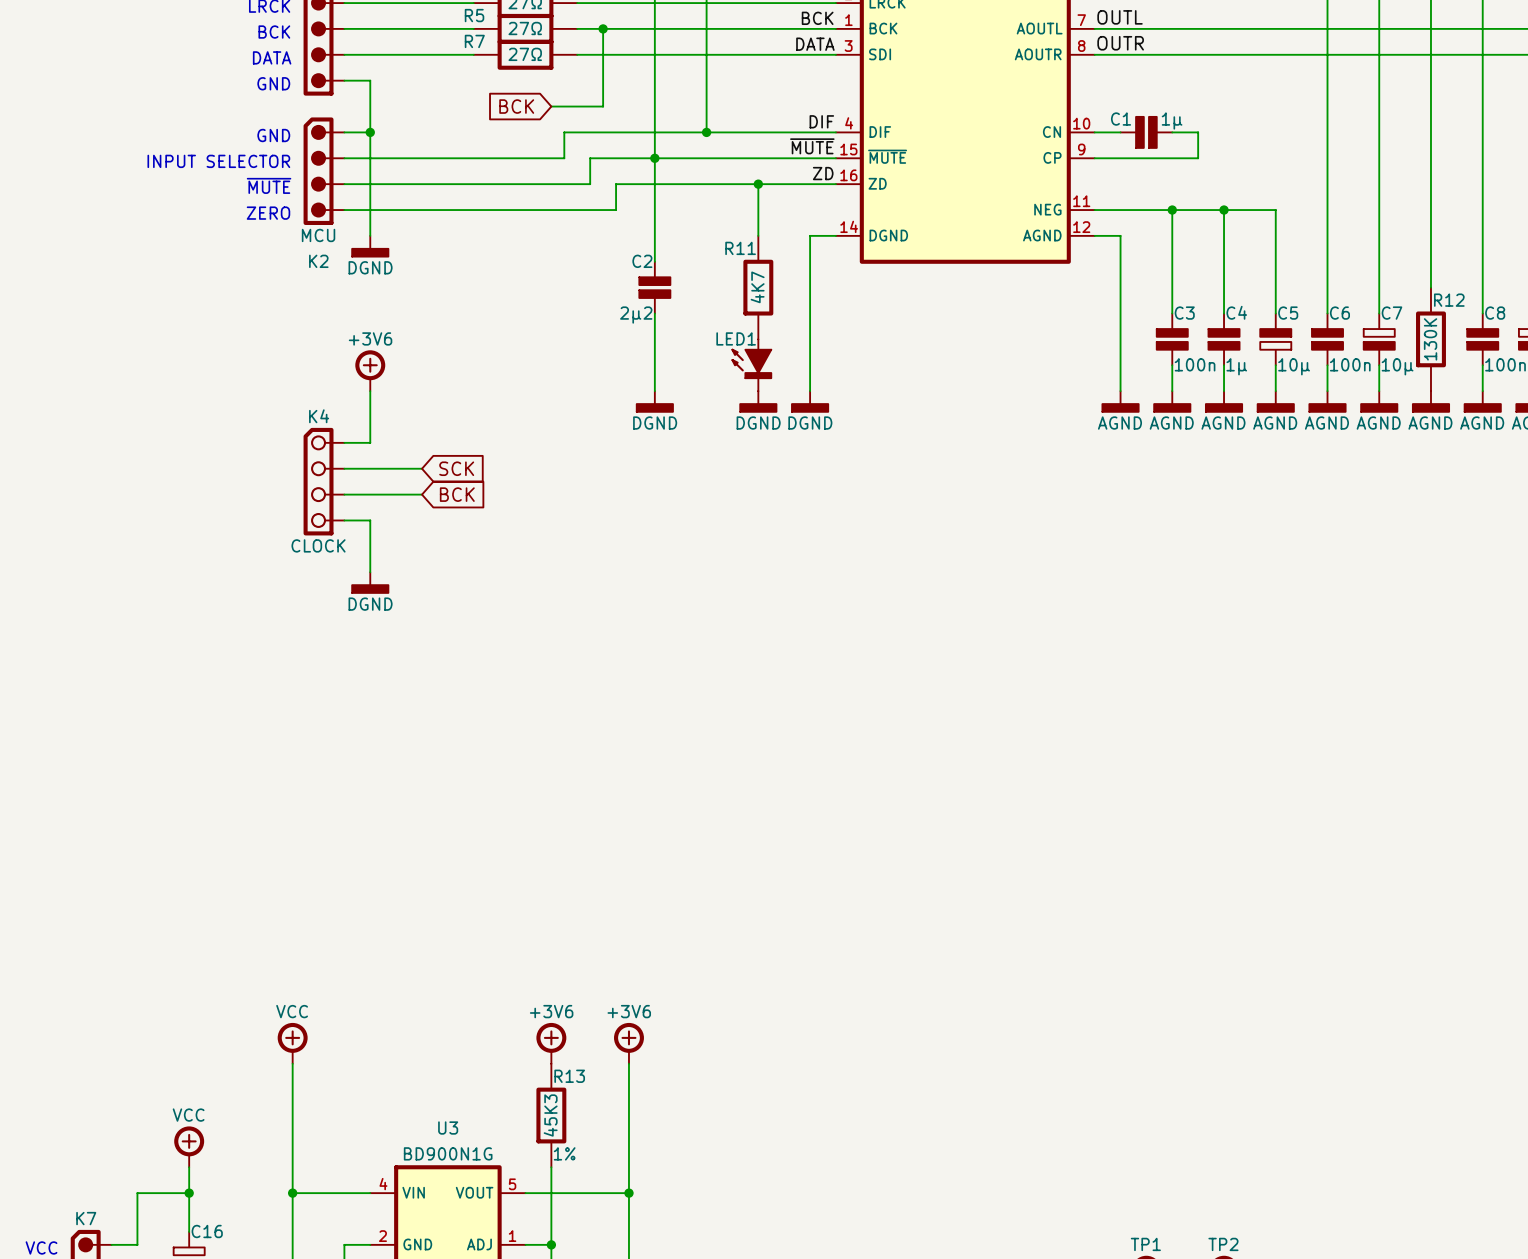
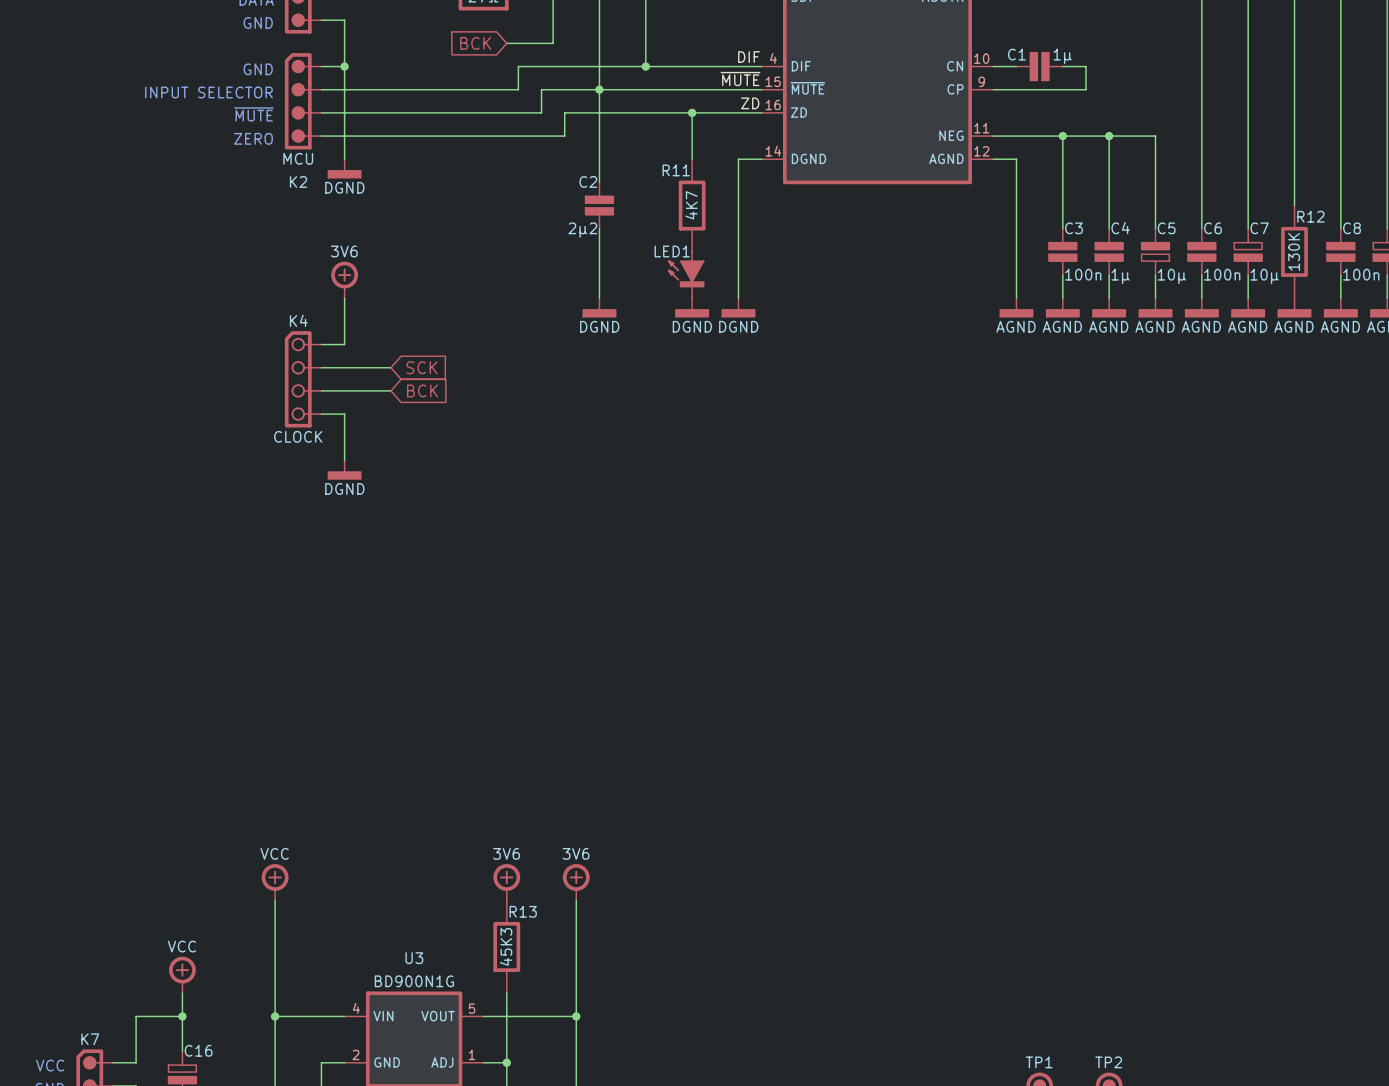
power symbol text: +3V6 (370, 338) -> 3V6 (344, 251)
power symbol text: +3V6 (551, 1011) -> 3V6 (506, 853)
power symbol text: +3V6 (629, 1011) -> 3V6 (576, 853)
R13 text: 1% (564, 1153) -> none

